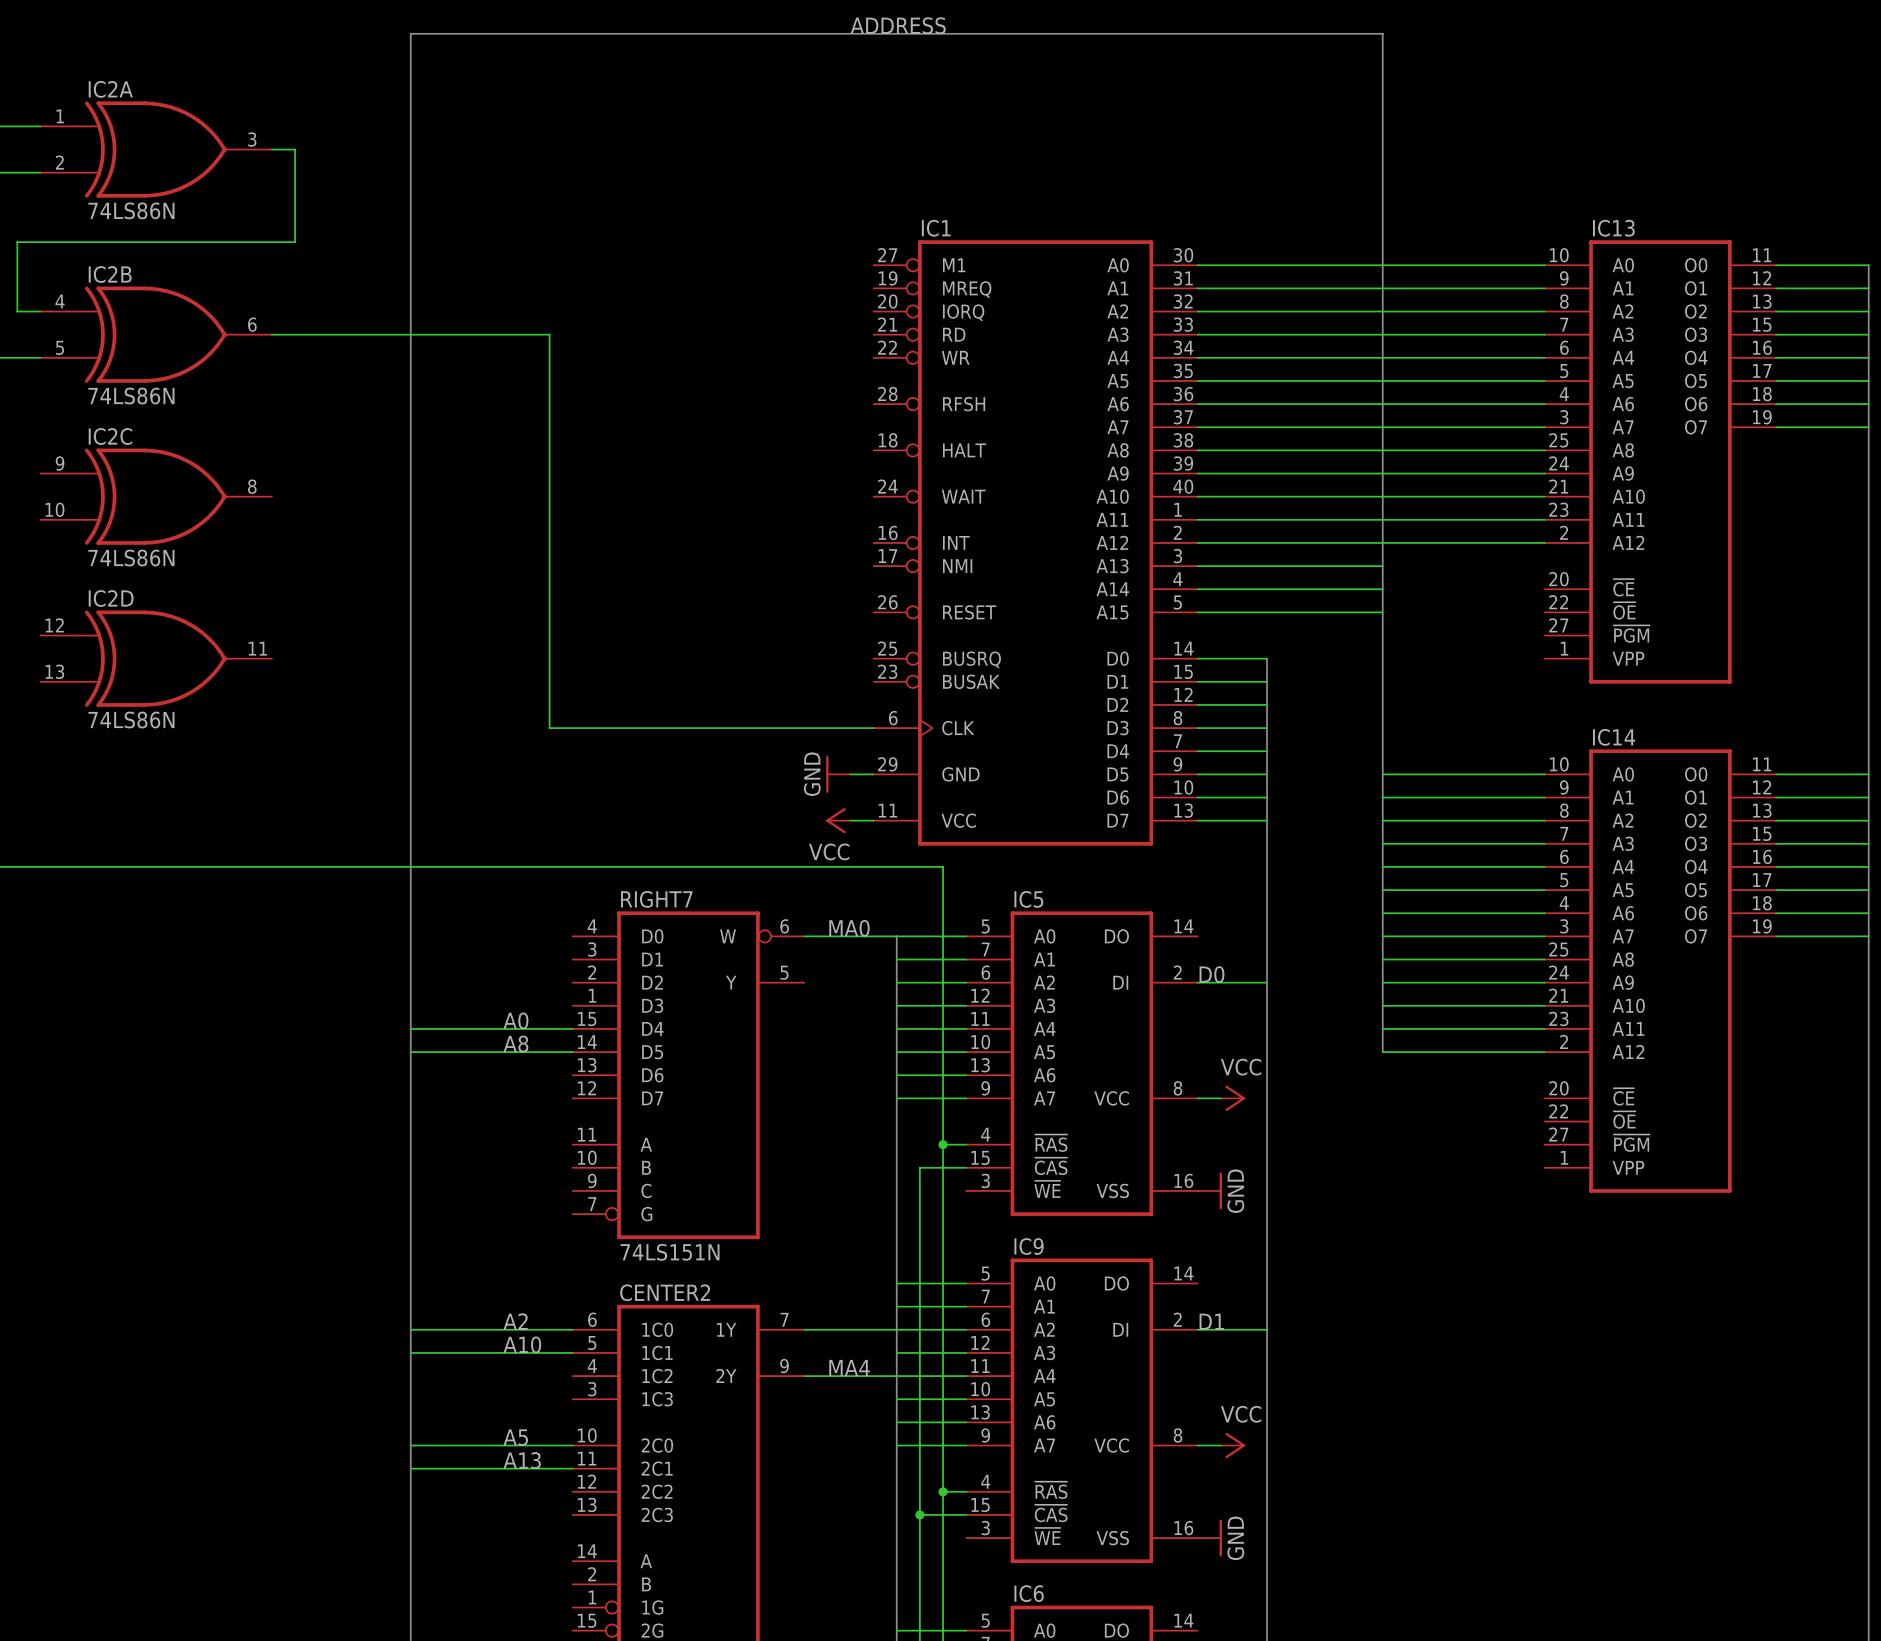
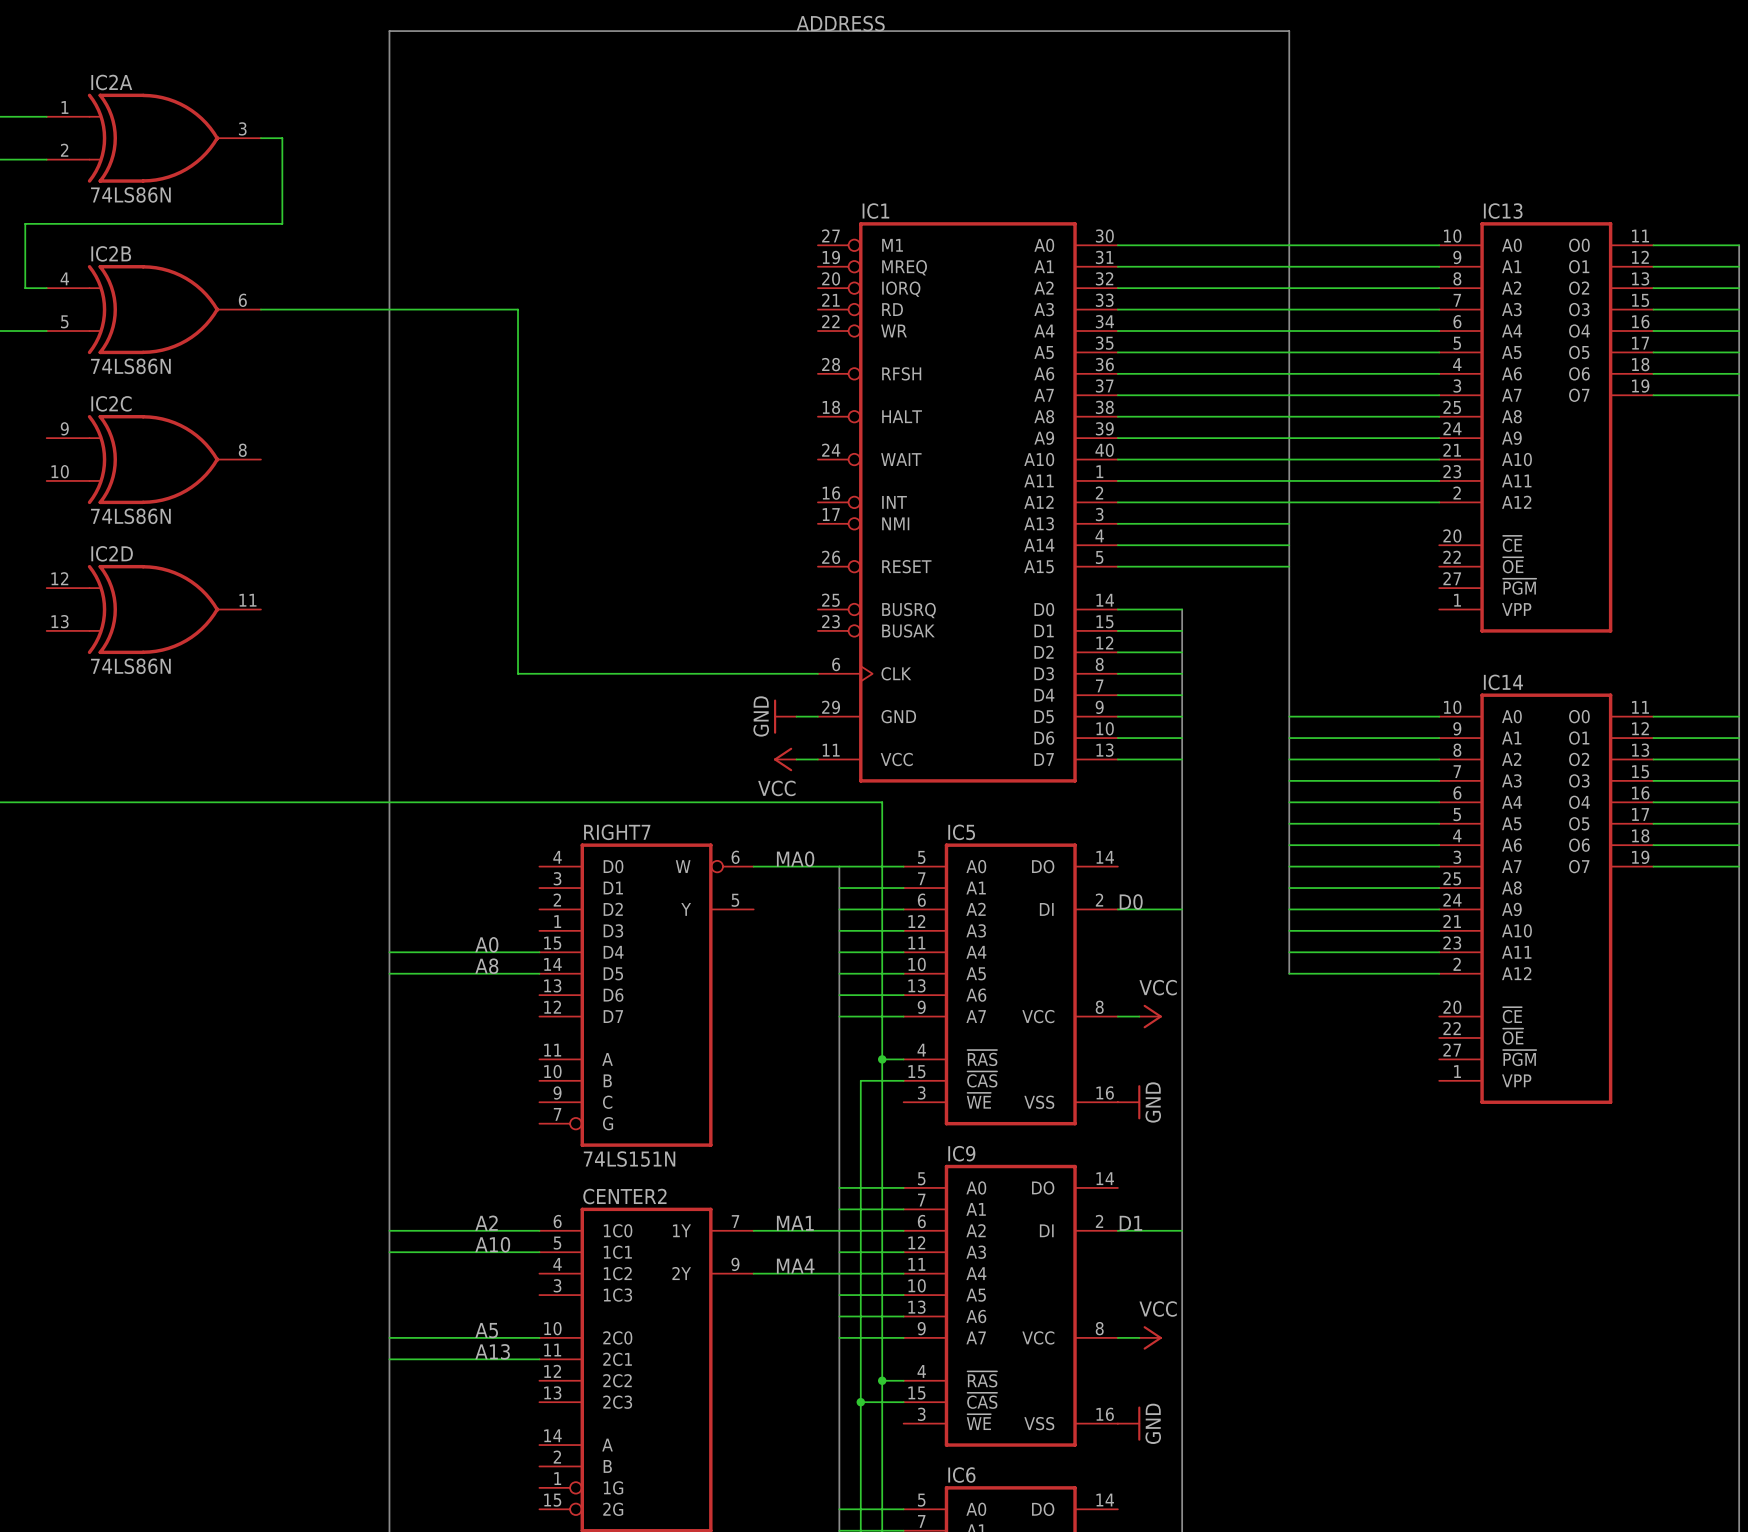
label: none -> MA1 (795, 1223)

